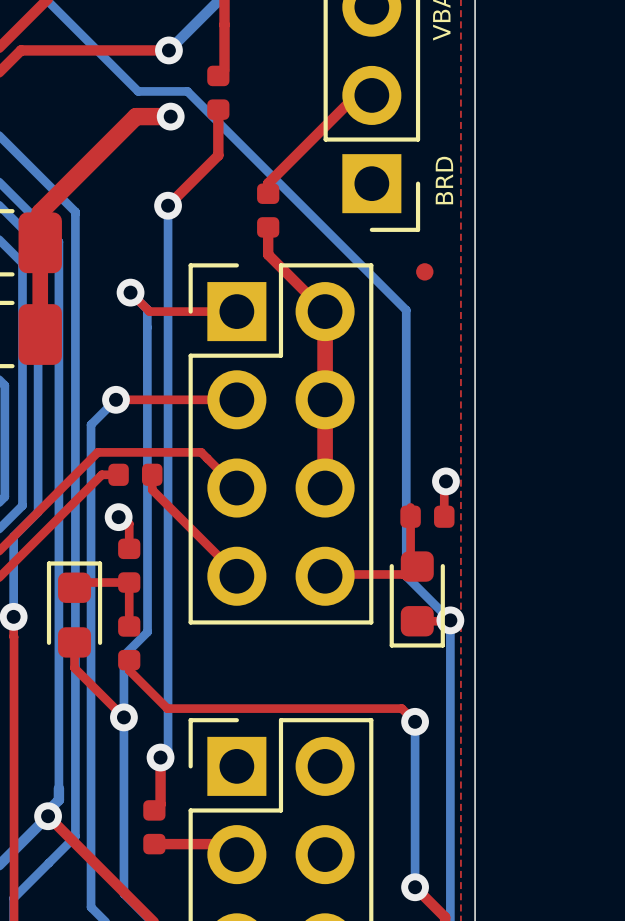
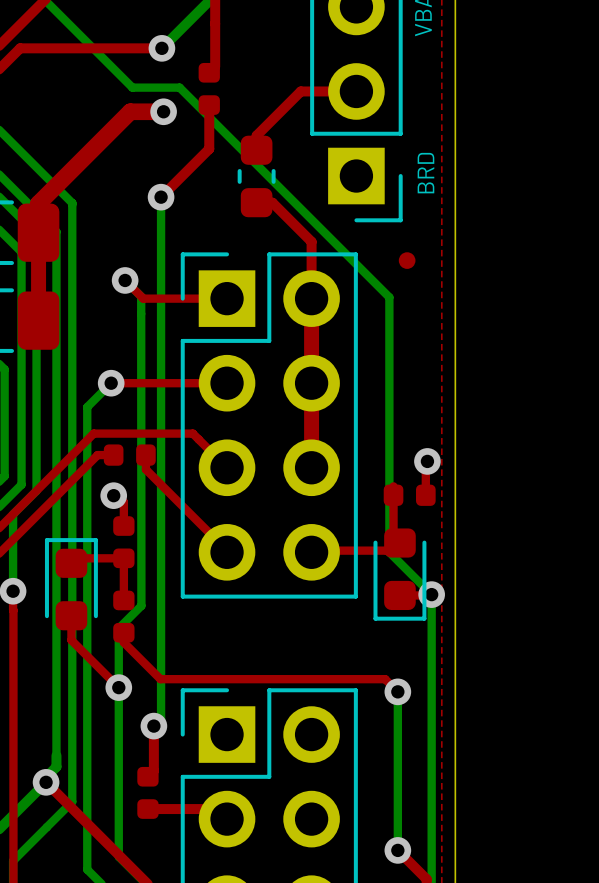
top track: (356, 95) (268, 183) (268, 193) -> (341, 91) (300, 91) (256, 135) (256, 150)
part footprint: [257, 183, 280, 238] -> [237, 135, 276, 218]
top track: (268, 227) (268, 254) (325, 311) -> (256, 202) (272, 202) (311, 241) (311, 298)

